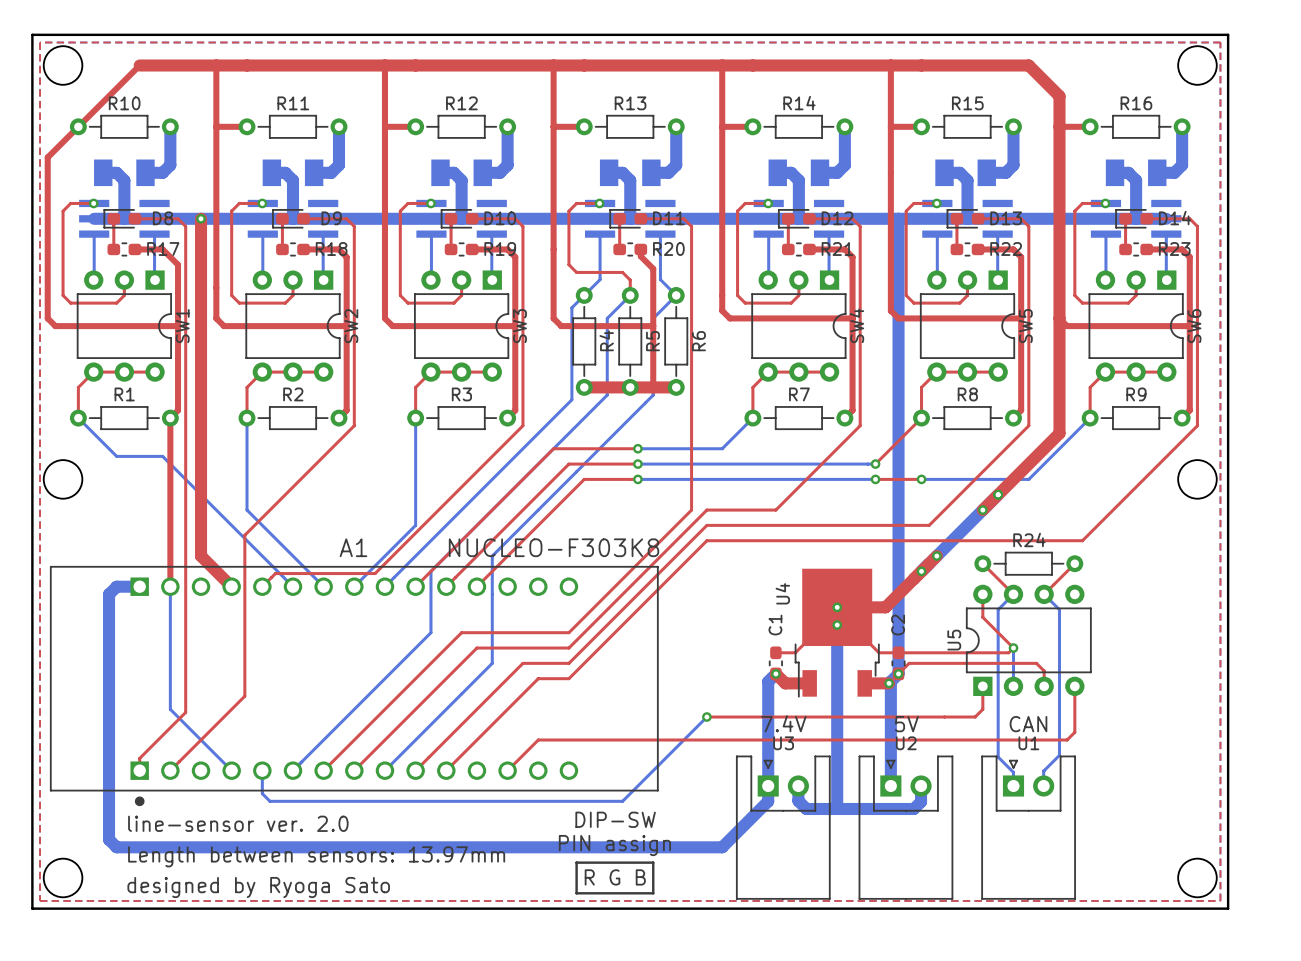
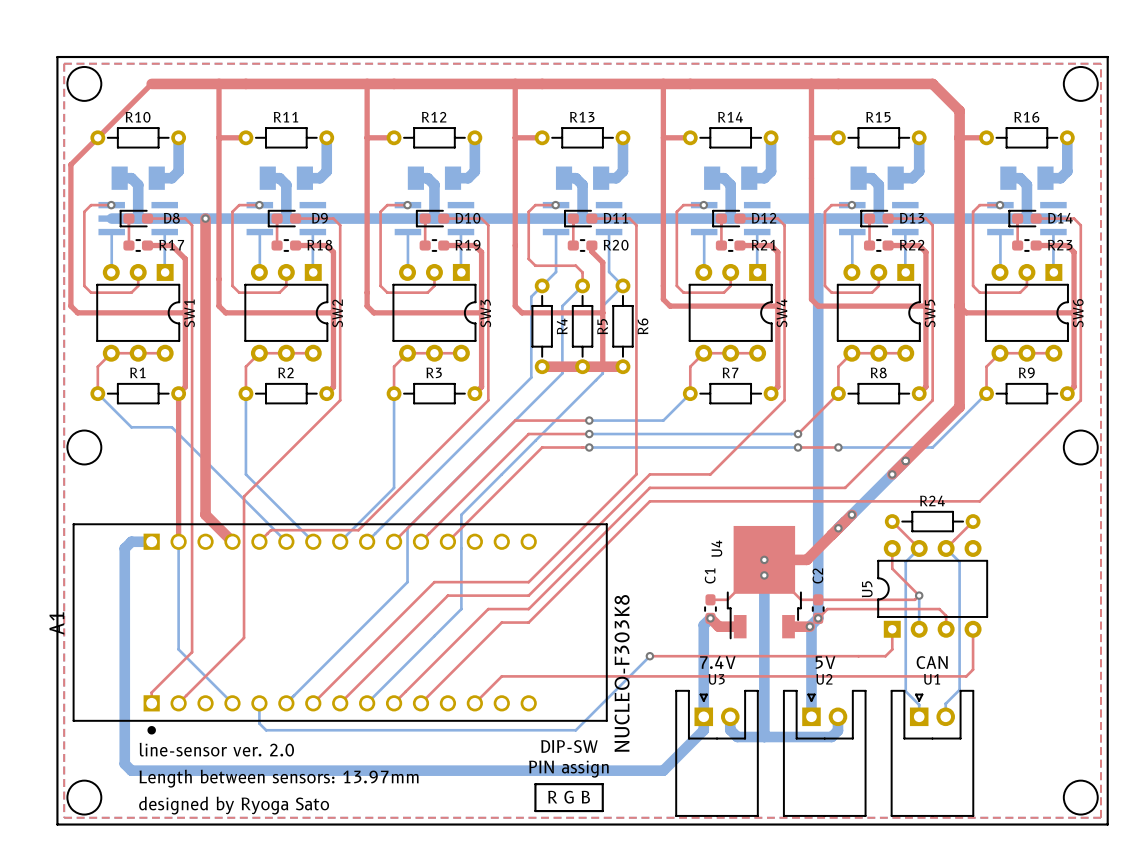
A1 name rotation: 0° (353, 547) -> 90° counterclockwise (56, 623)
A1 name position: A1 (353, 547) -> A1 (56, 623)
A1 value rotation: 0° (554, 547) -> 90° counterclockwise (622, 673)

